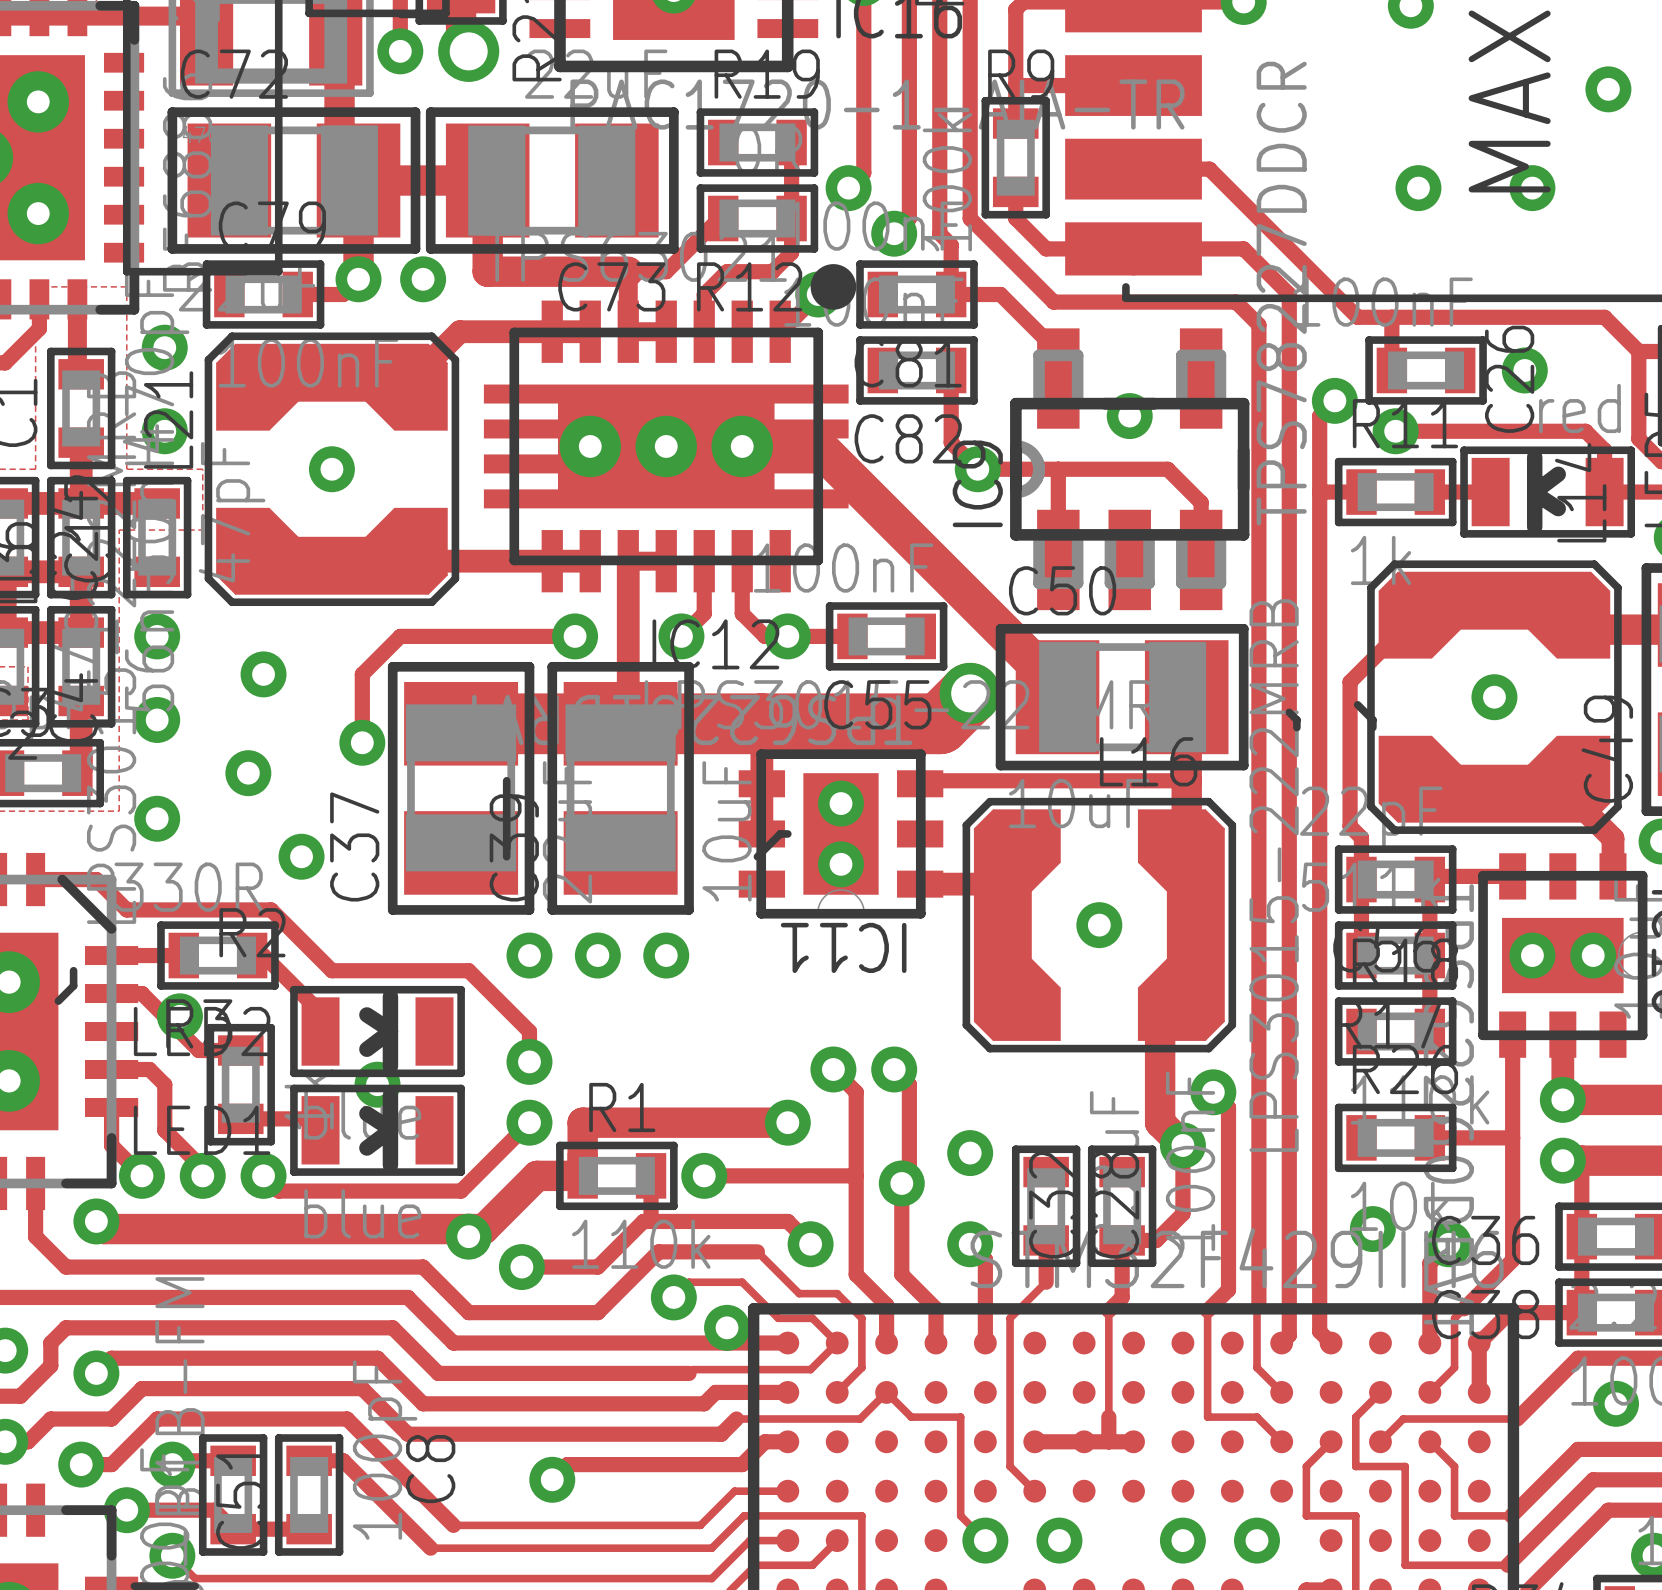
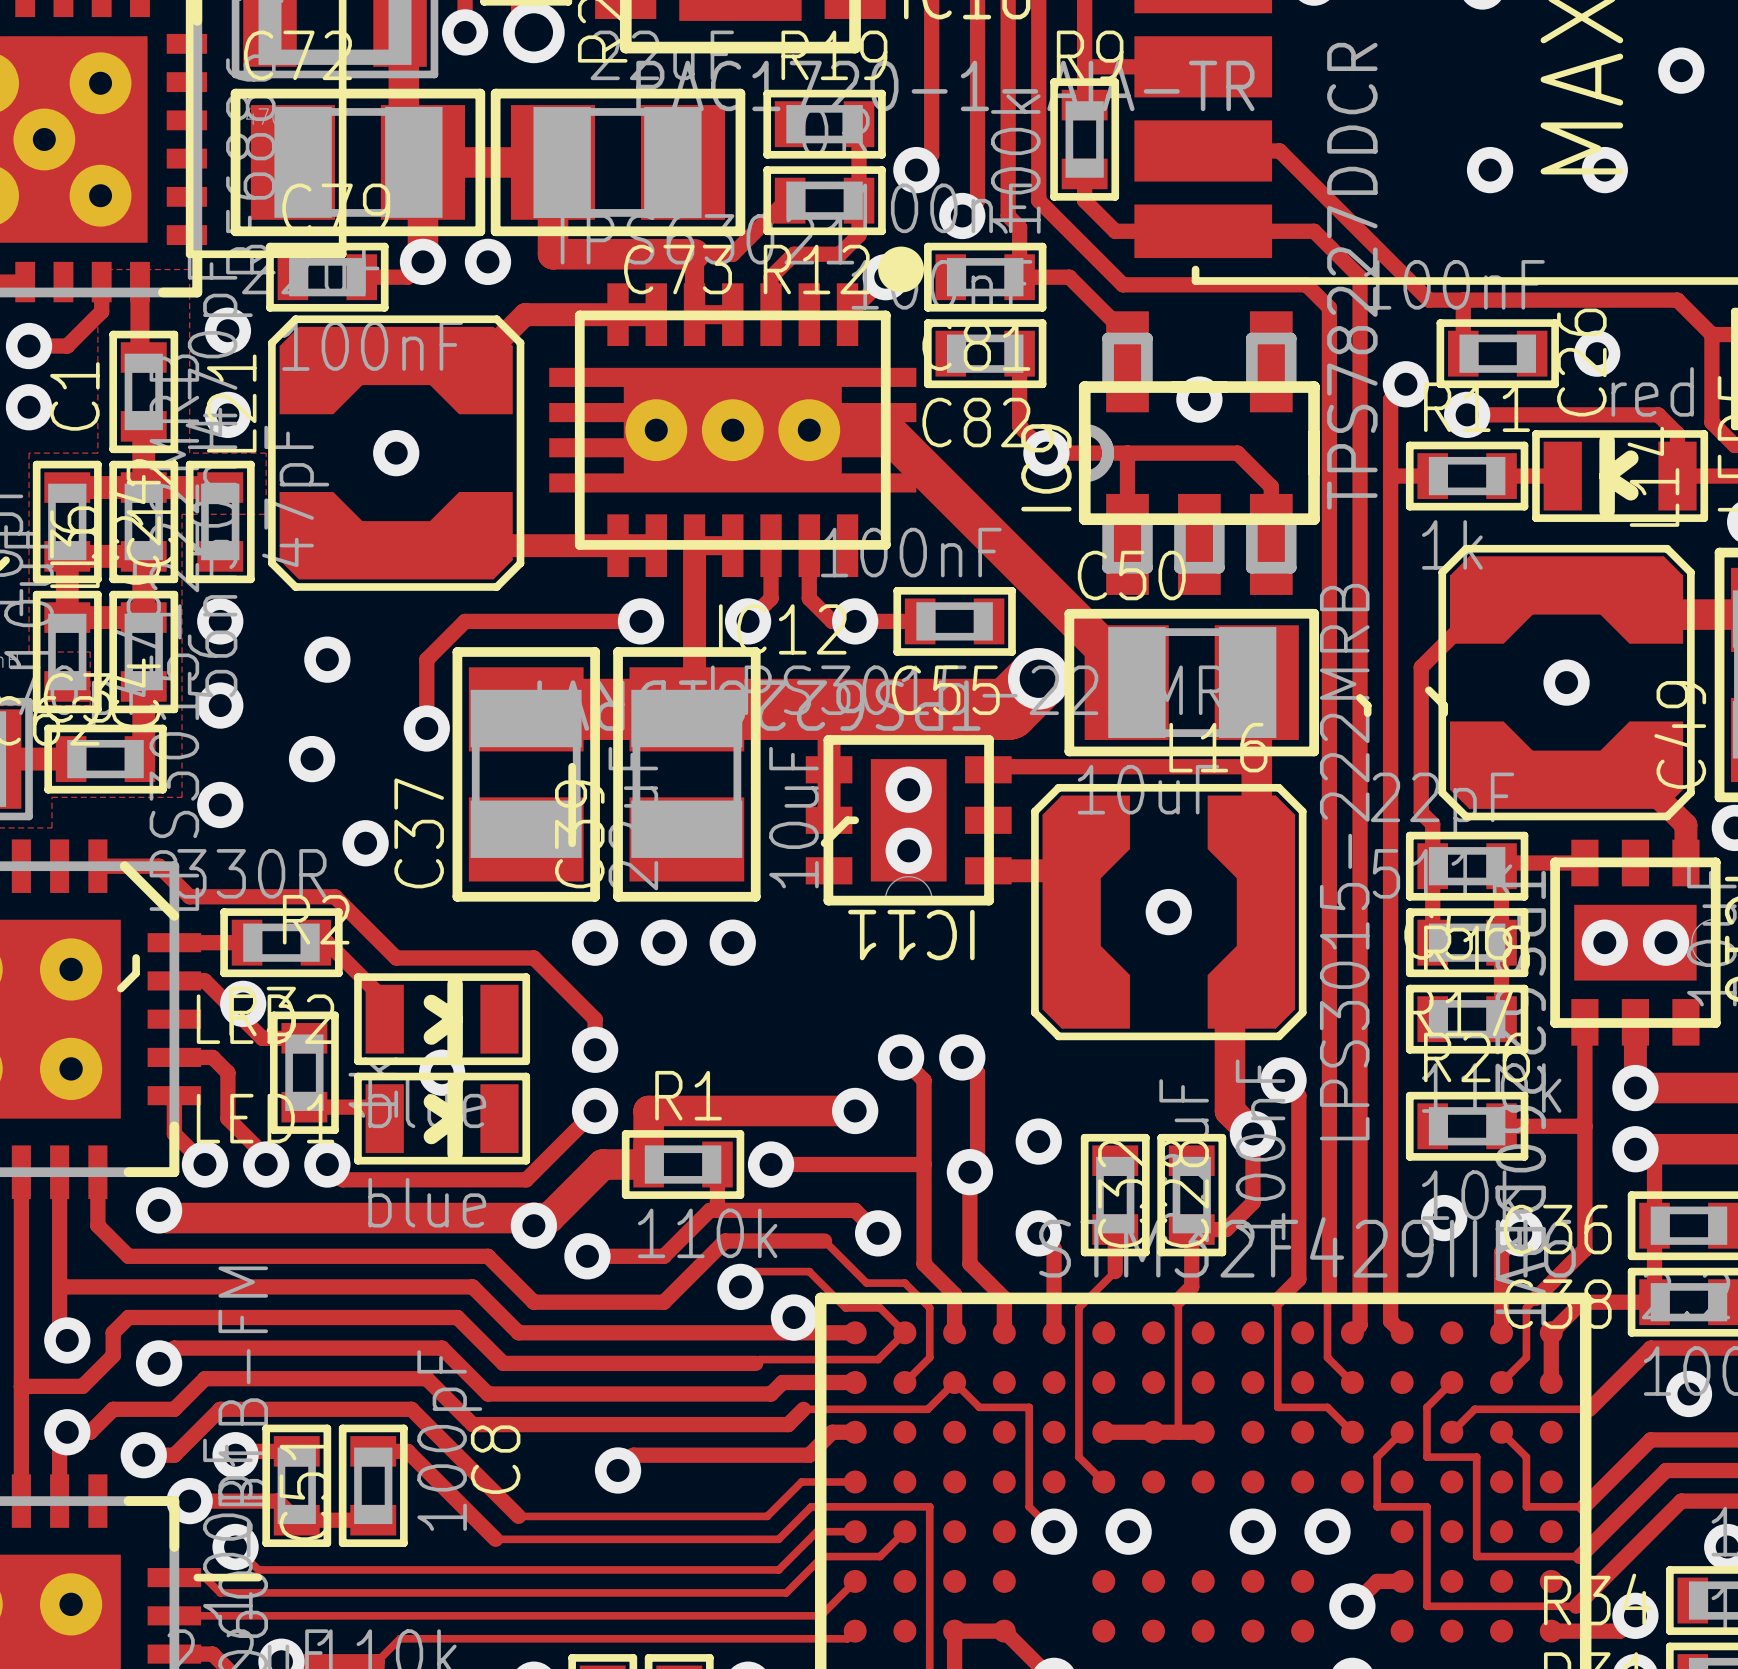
track width: thick (1108, 1417) (1108, 1441) -> thin (1178, 1407) (1178, 1432)

